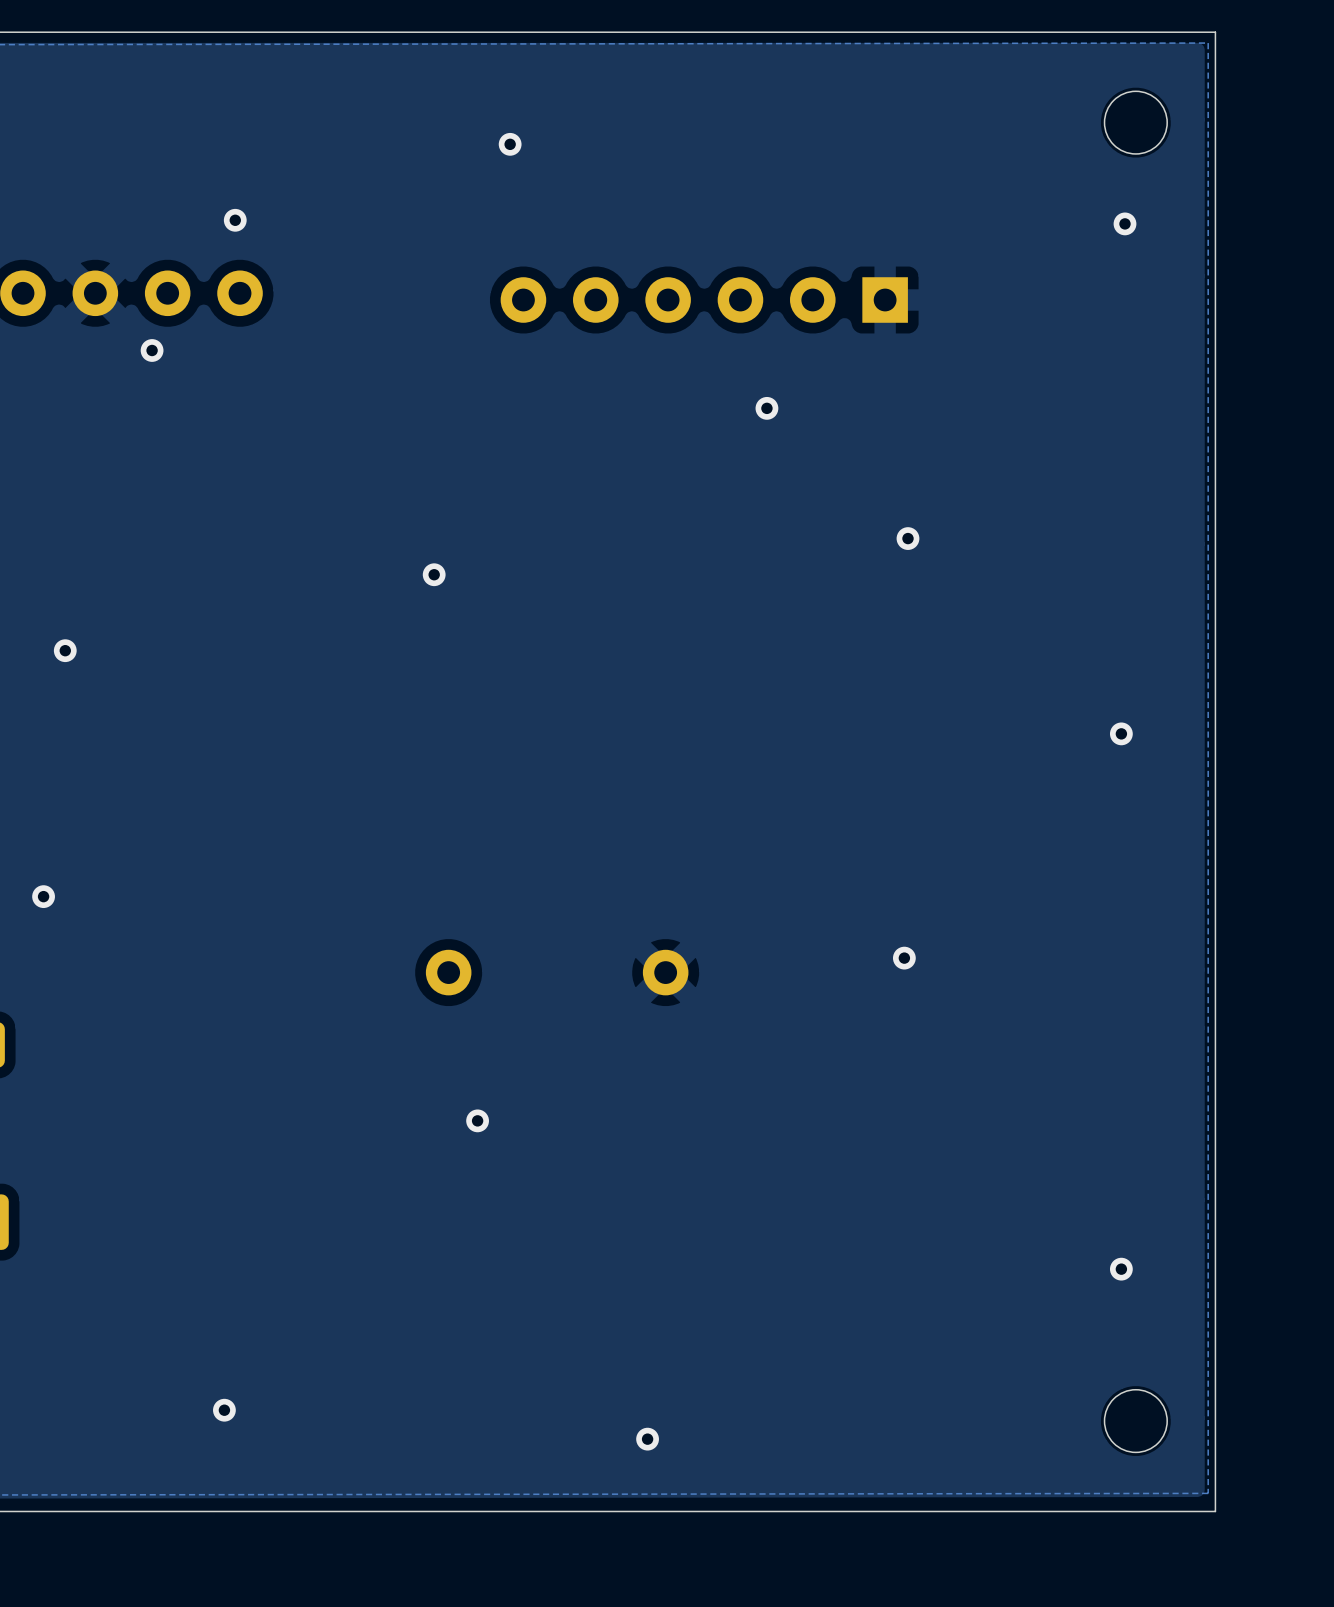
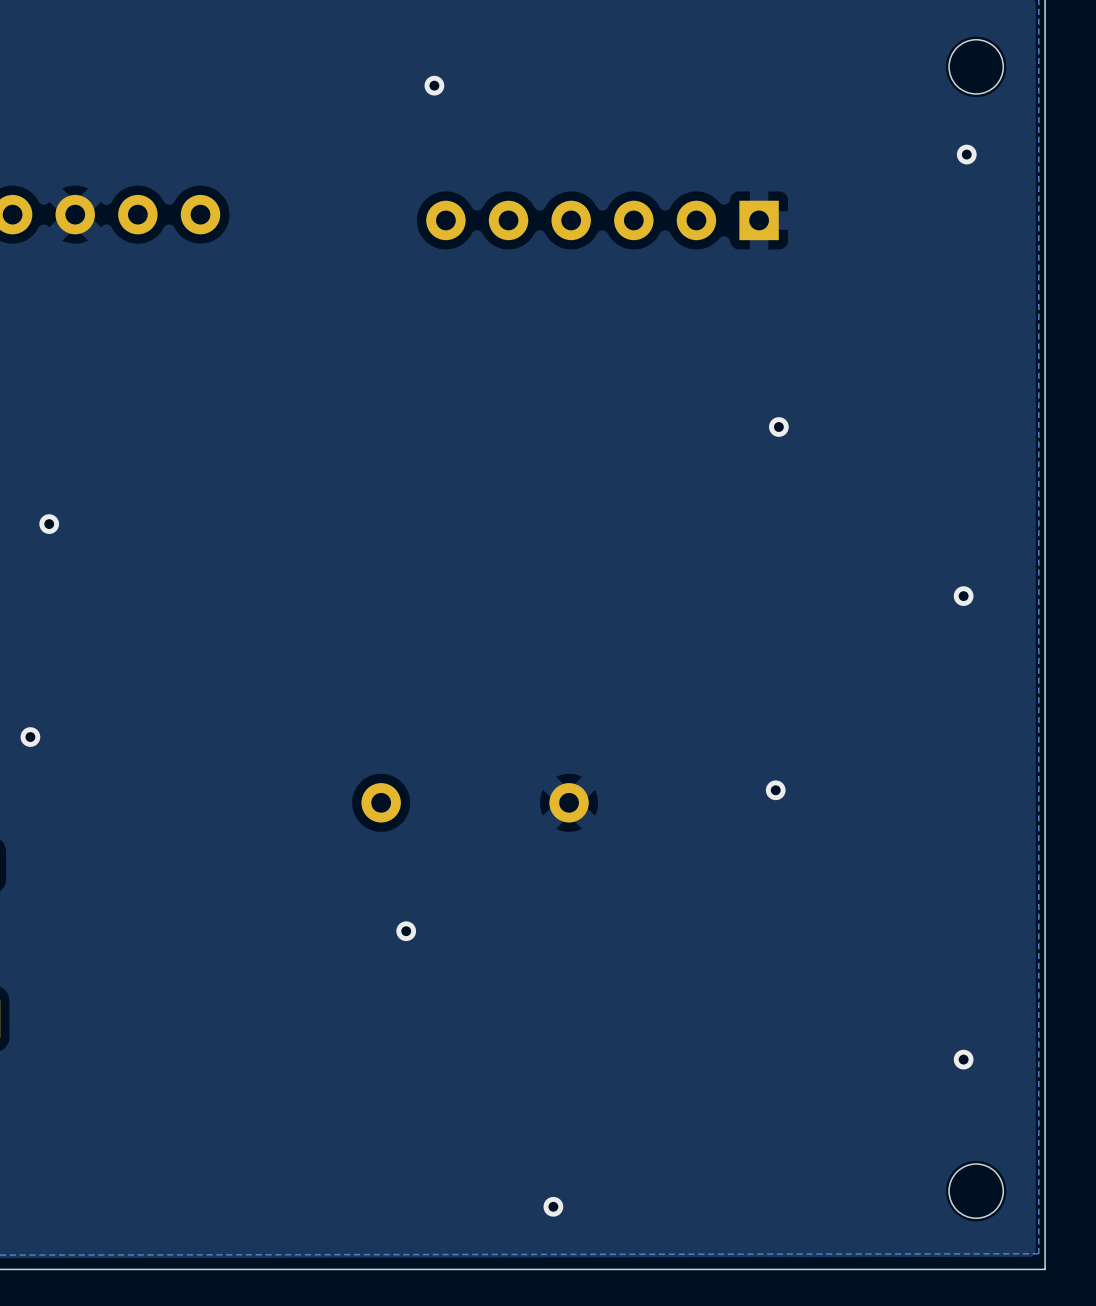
via: (235, 220) -> none
via: (152, 350) -> none
via: (766, 408) -> none
via: (434, 574) -> none
via: (224, 1410) -> none

